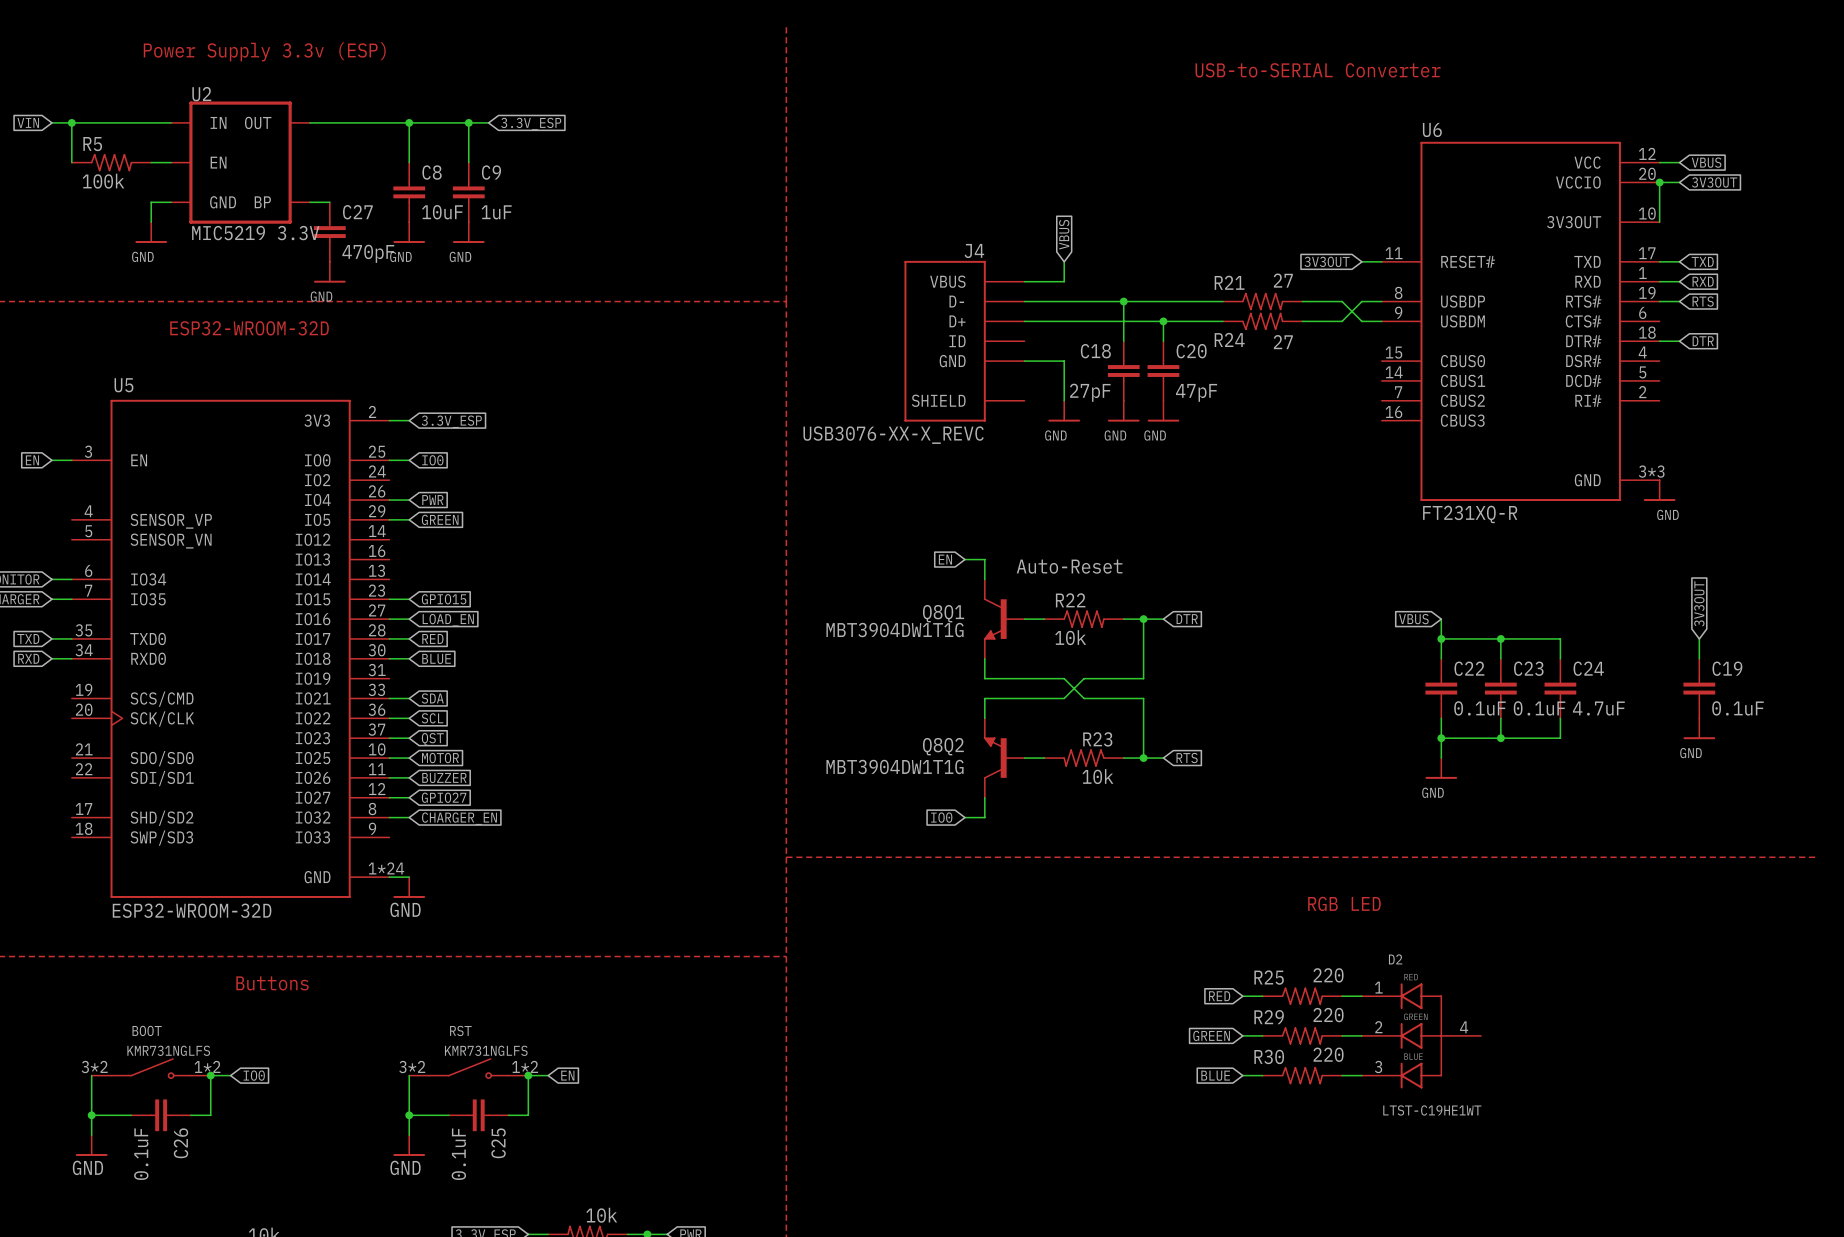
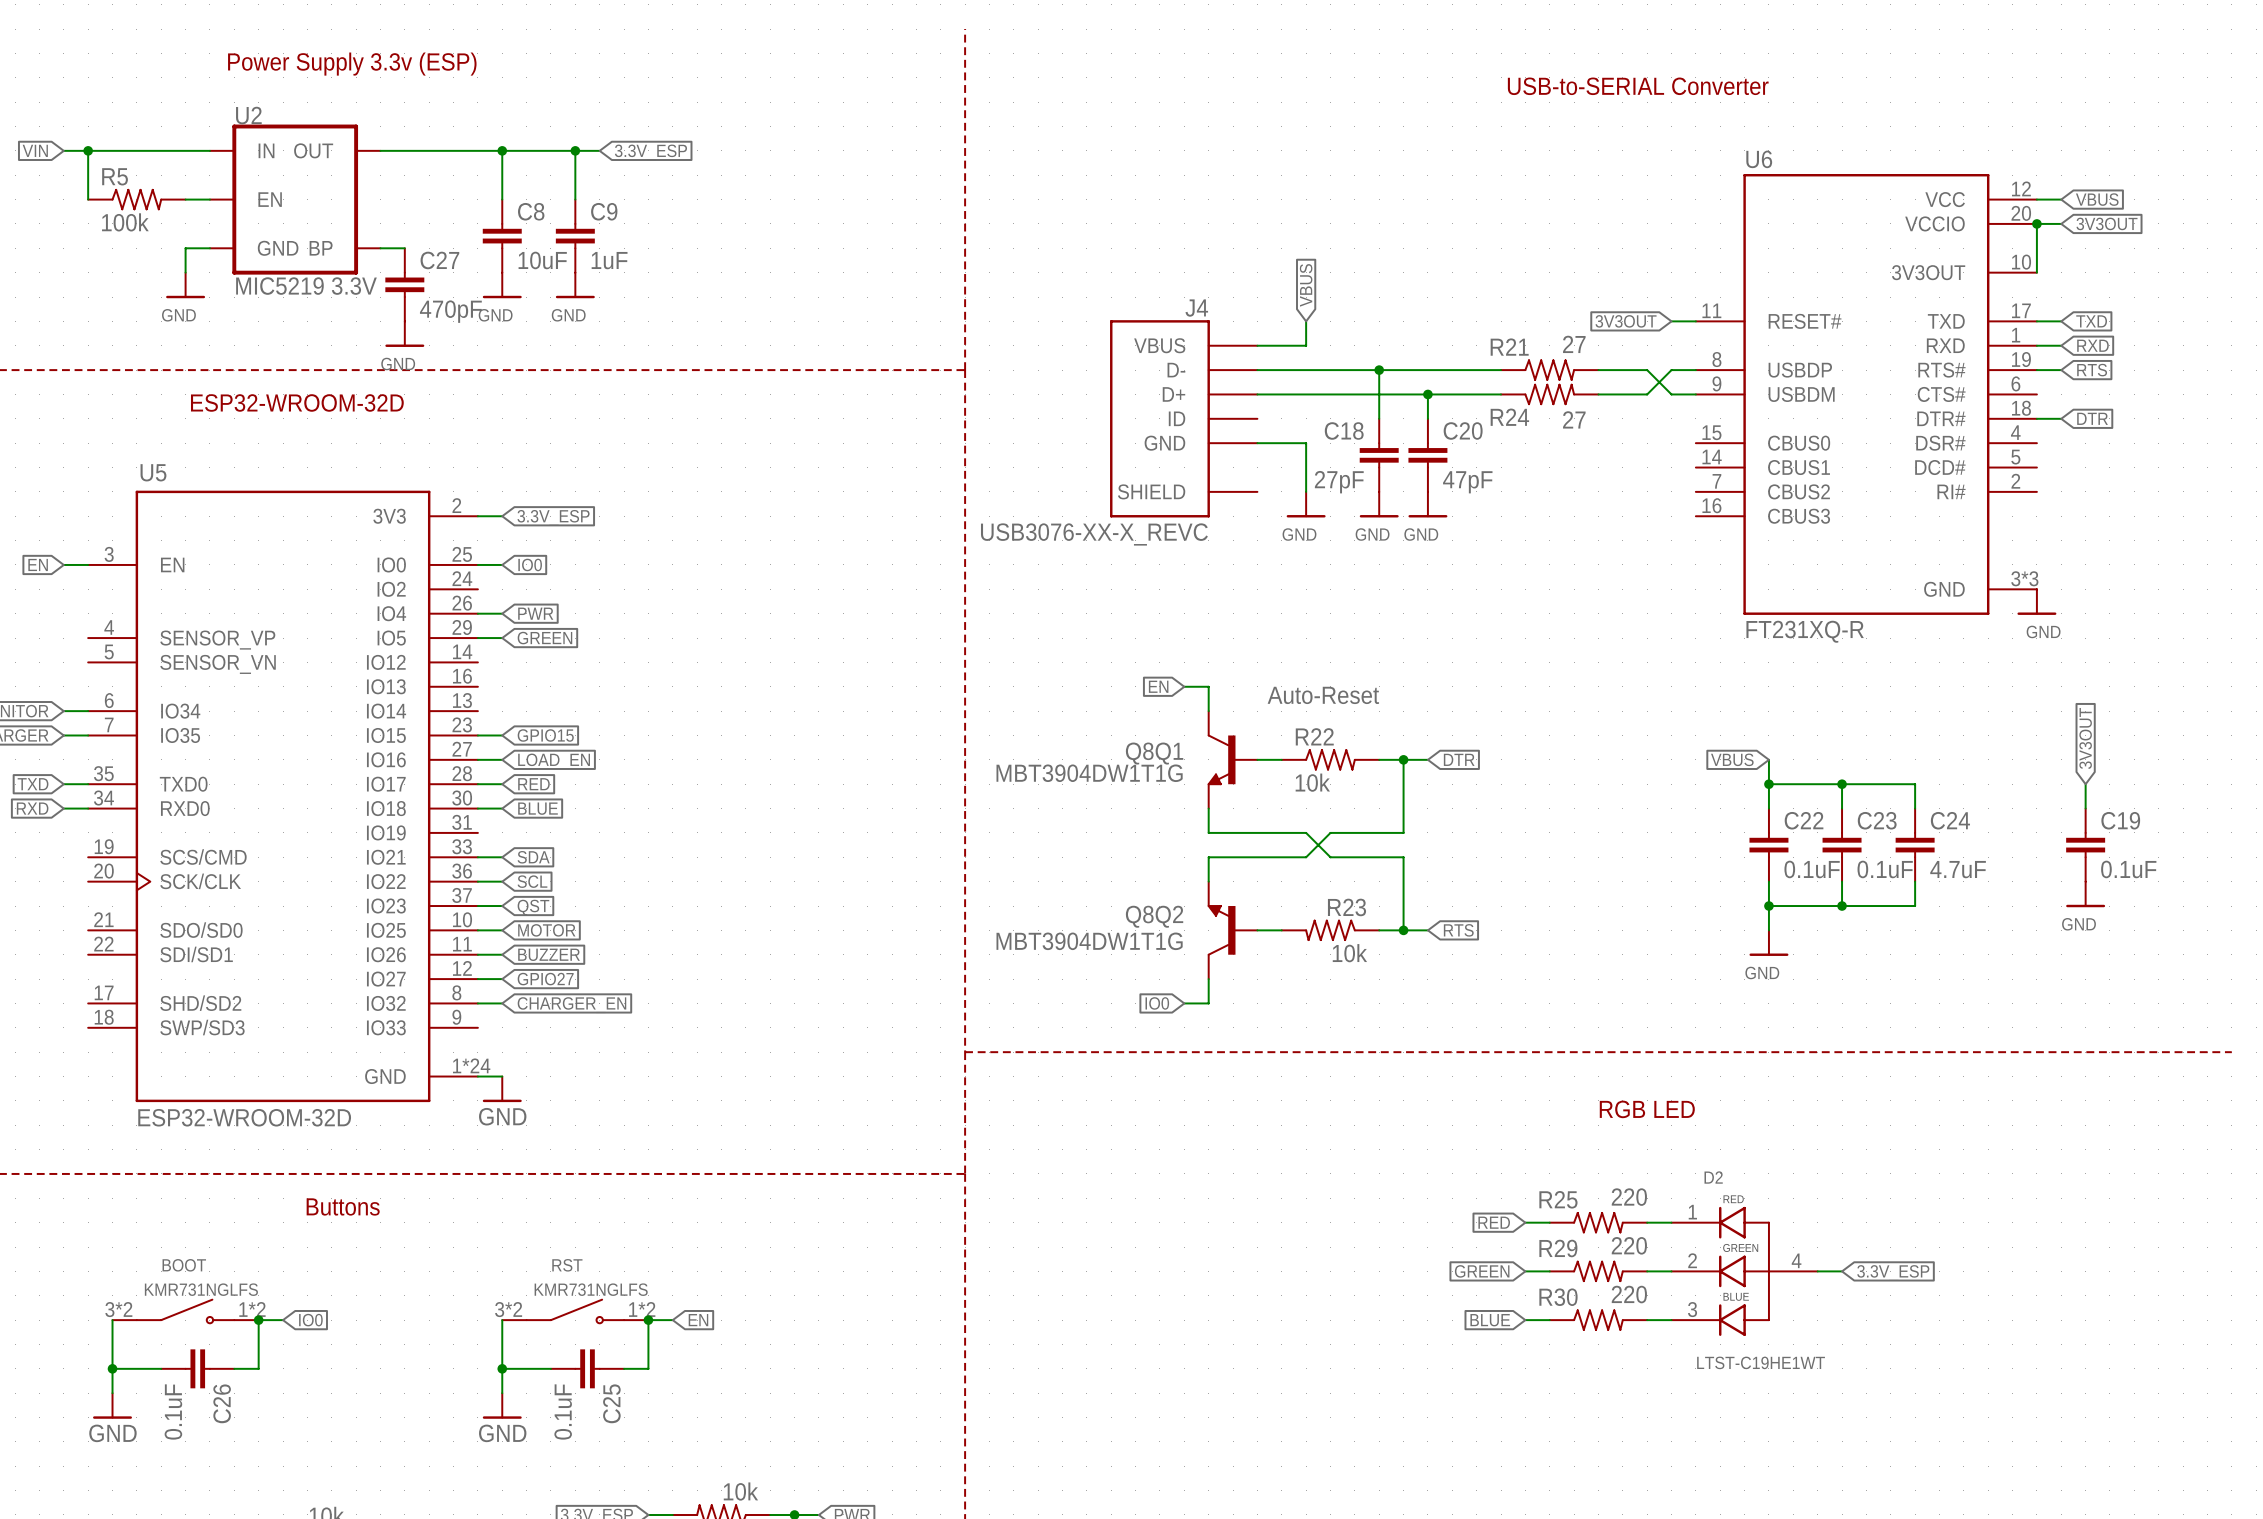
wire: none -> (1817, 1271) (1842, 1271)
global label: none -> 3.3V_ESP (1893, 1273)

